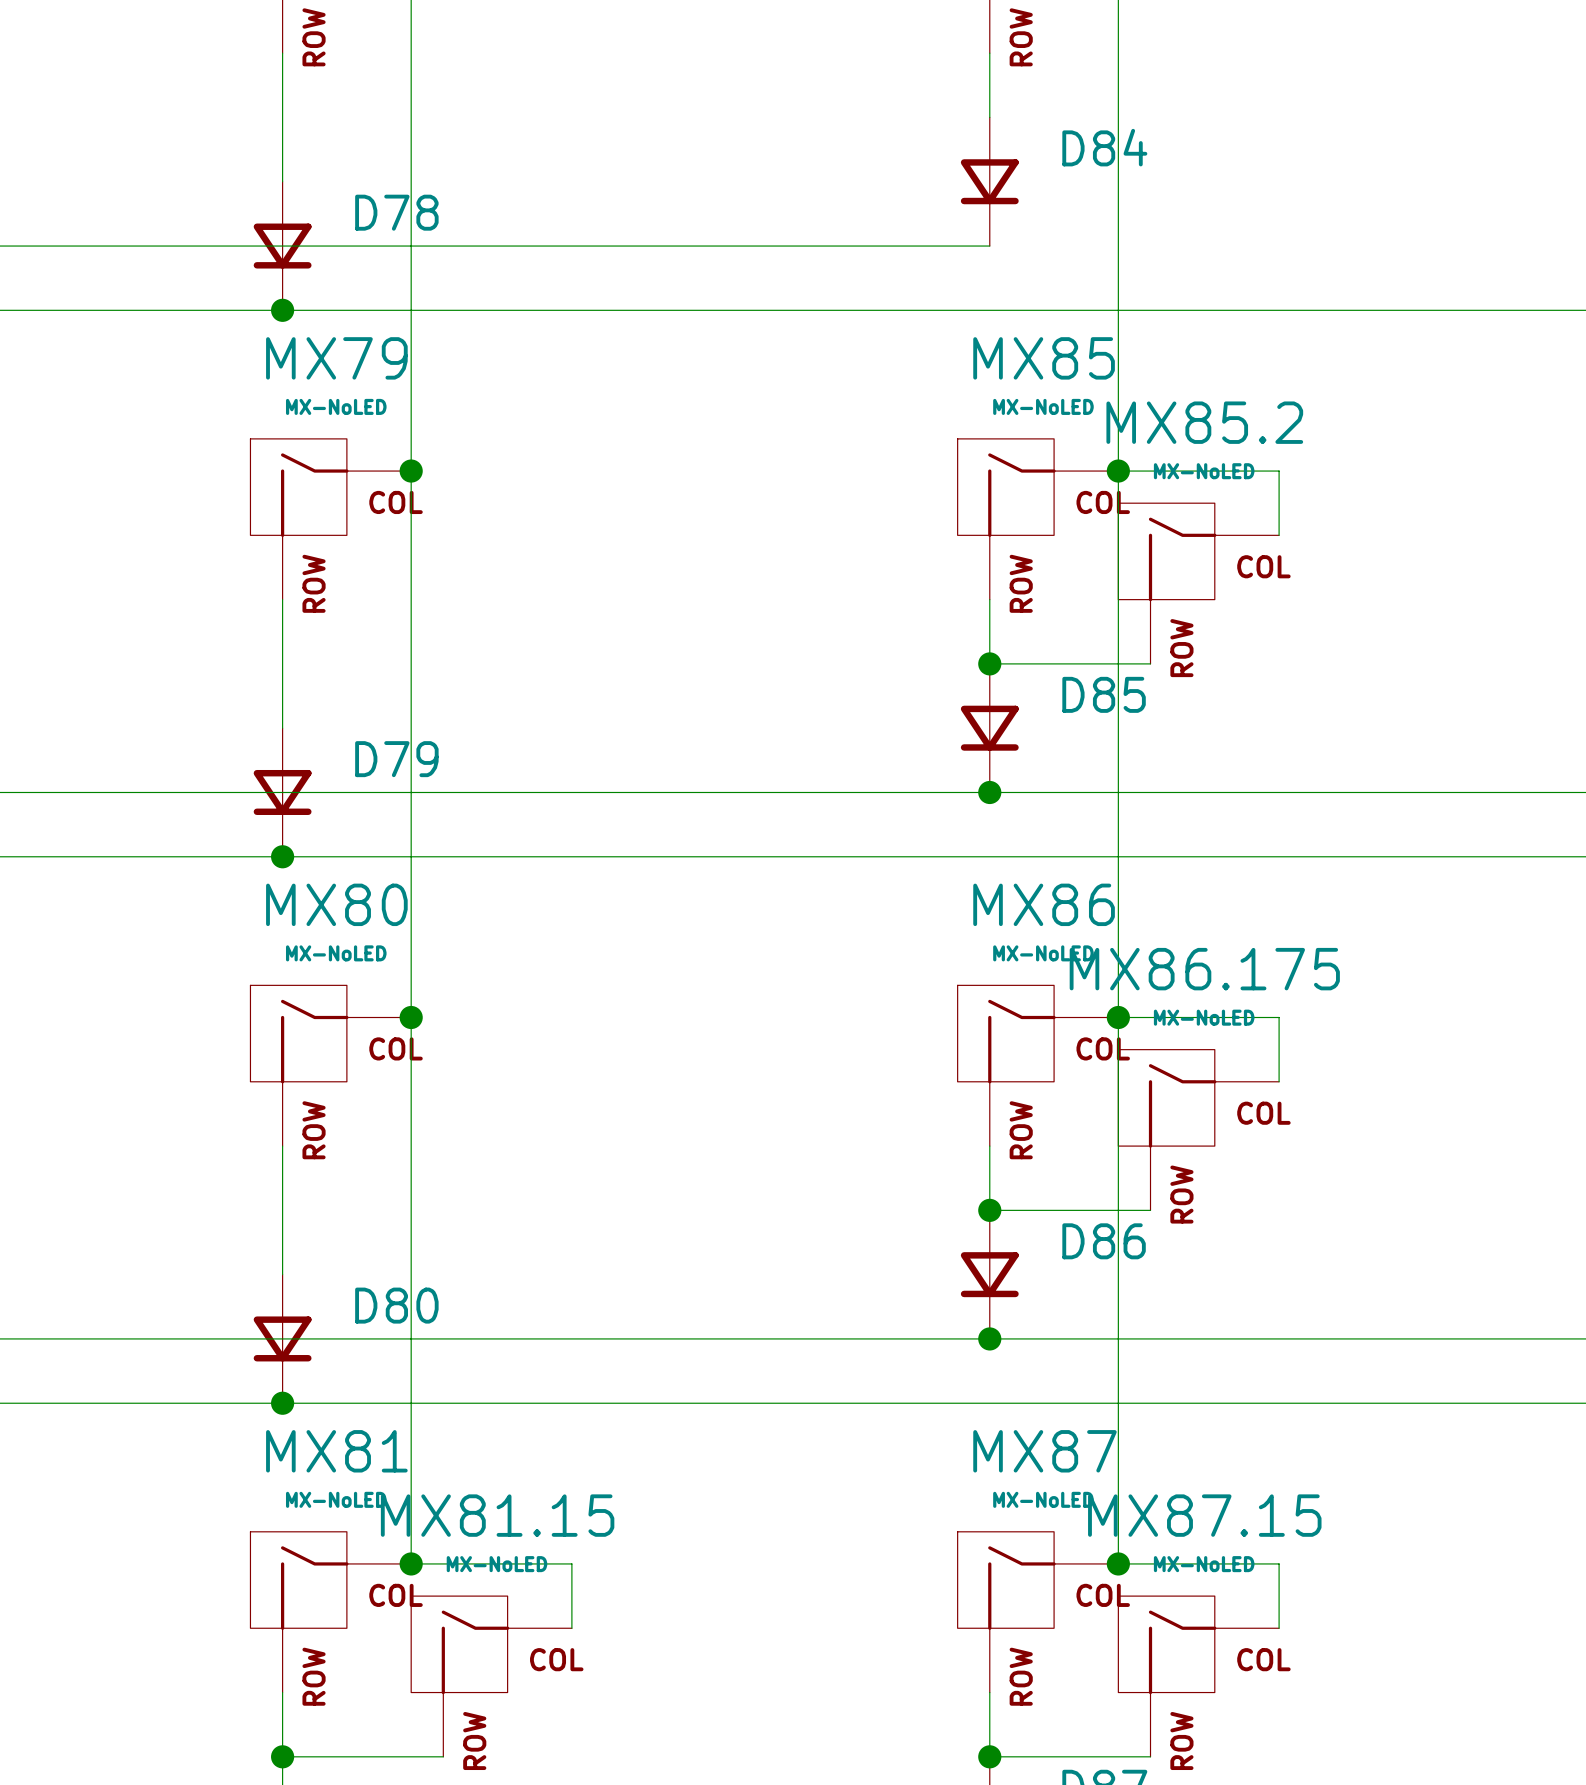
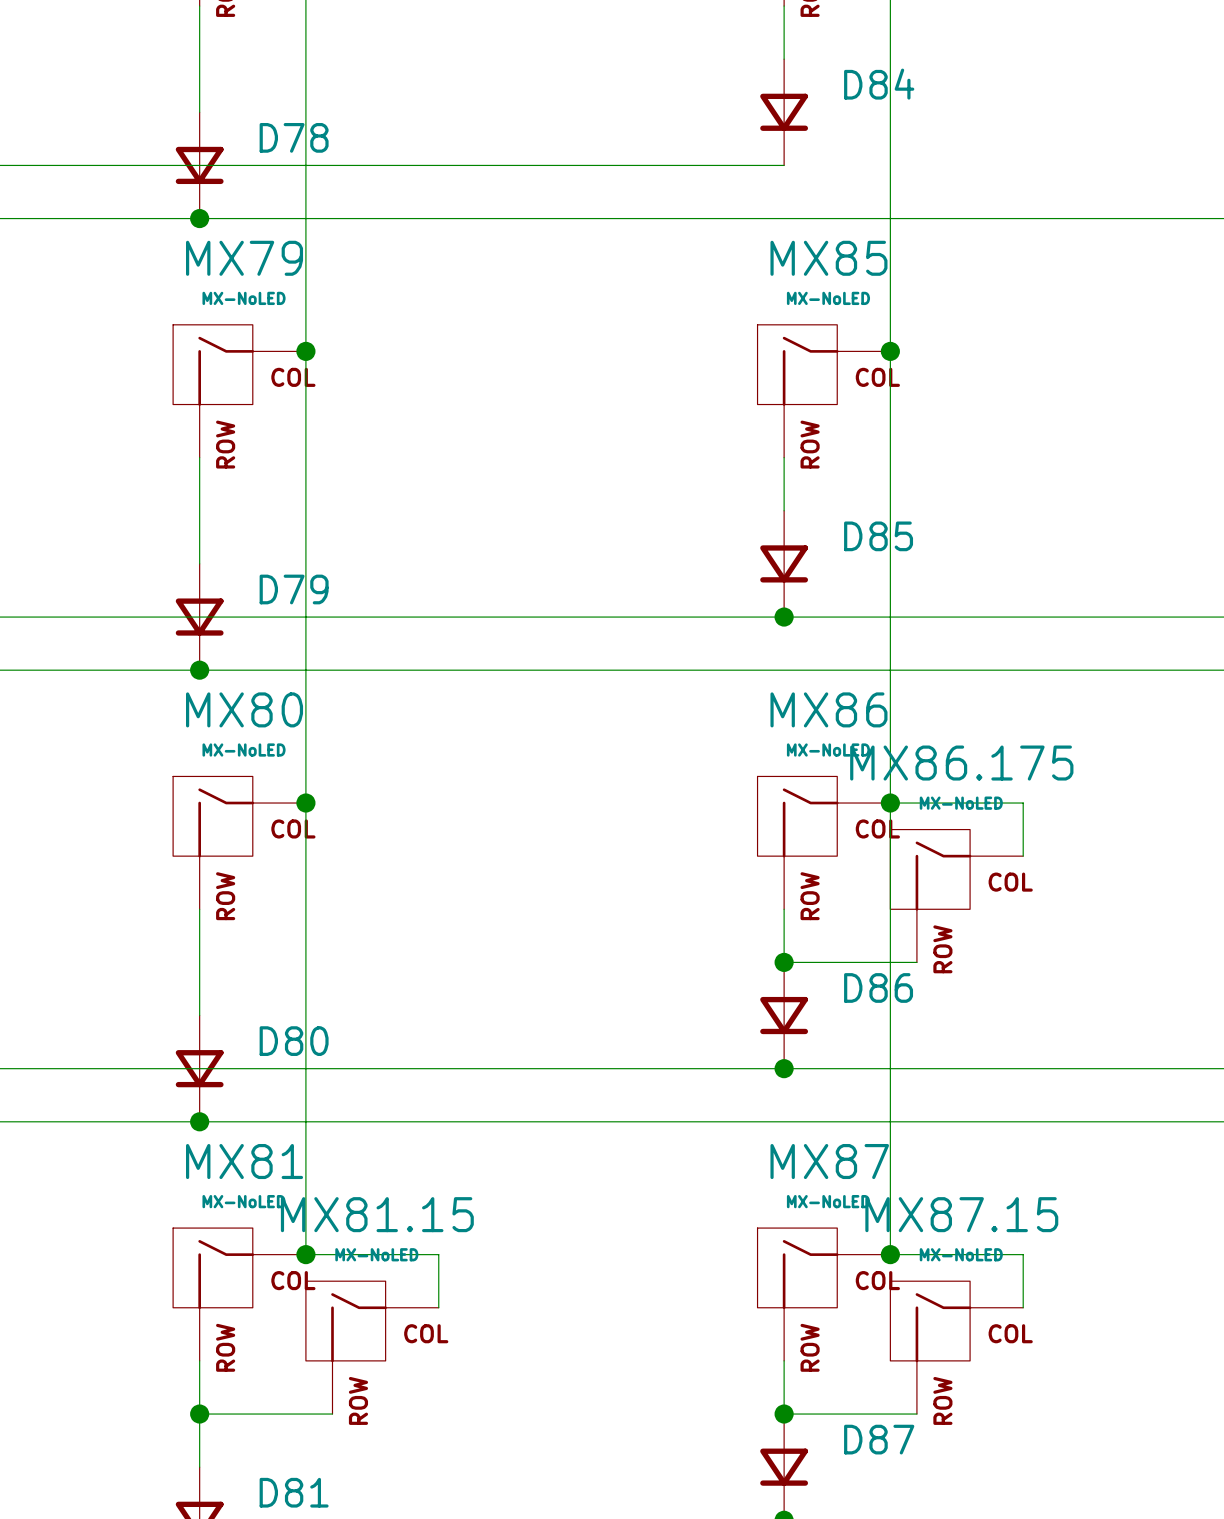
wire: (1118, 471) (1279, 471) (1279, 535) -> none
MX85.2: MX-NoLED (1198, 583) -> none
wire: (989, 663) (1150, 663) -> none
junction: (989, 663) -> none

